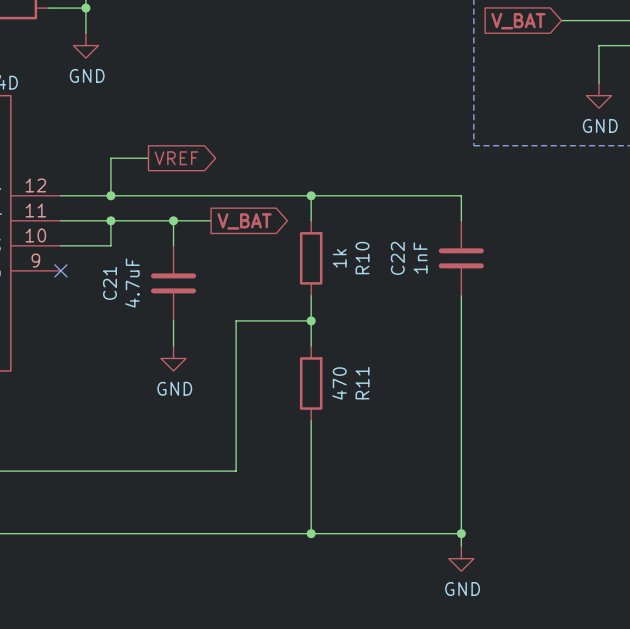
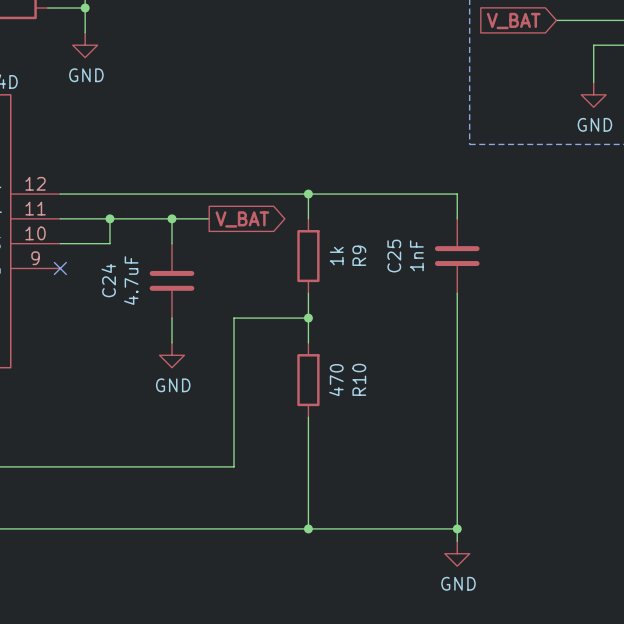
wire: (148, 158) (110, 158) (110, 195) -> none
global label: VREF (176, 158) -> none
junction: (110, 195) -> none
R10 name: R10 (362, 258) -> R9 (359, 255)
C22 name: C22 (397, 258) -> C25 (394, 256)
C21 name: C21 (109, 283) -> C24 (108, 280)
R11 name: R11 (362, 383) -> R10 (359, 379)

